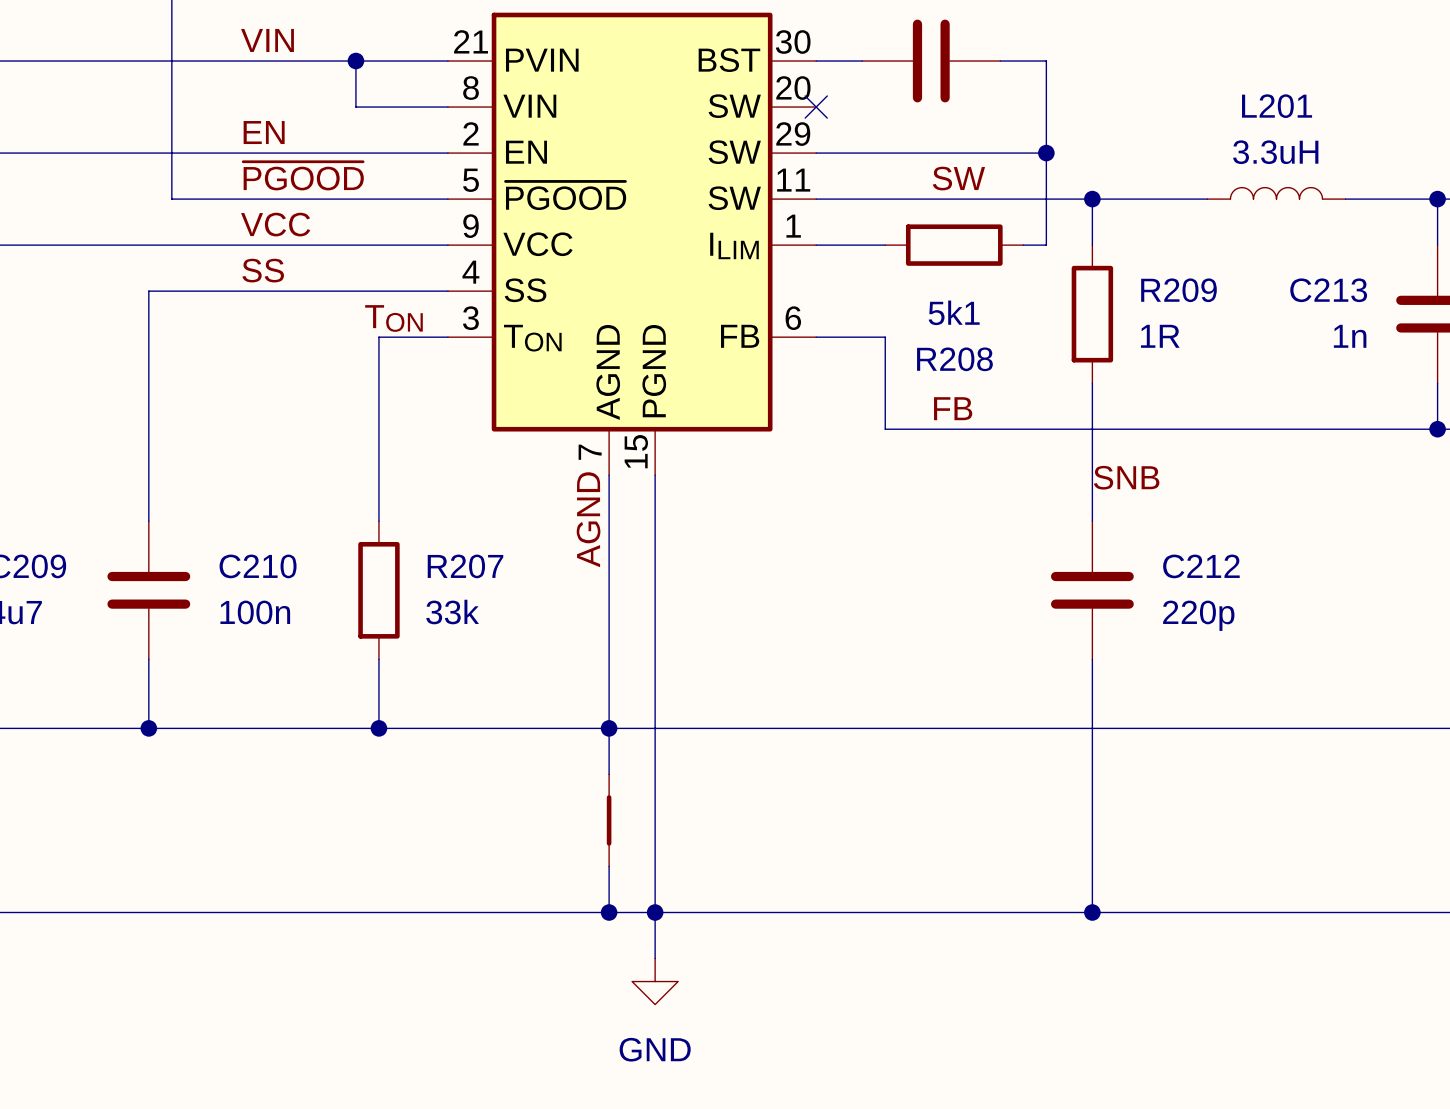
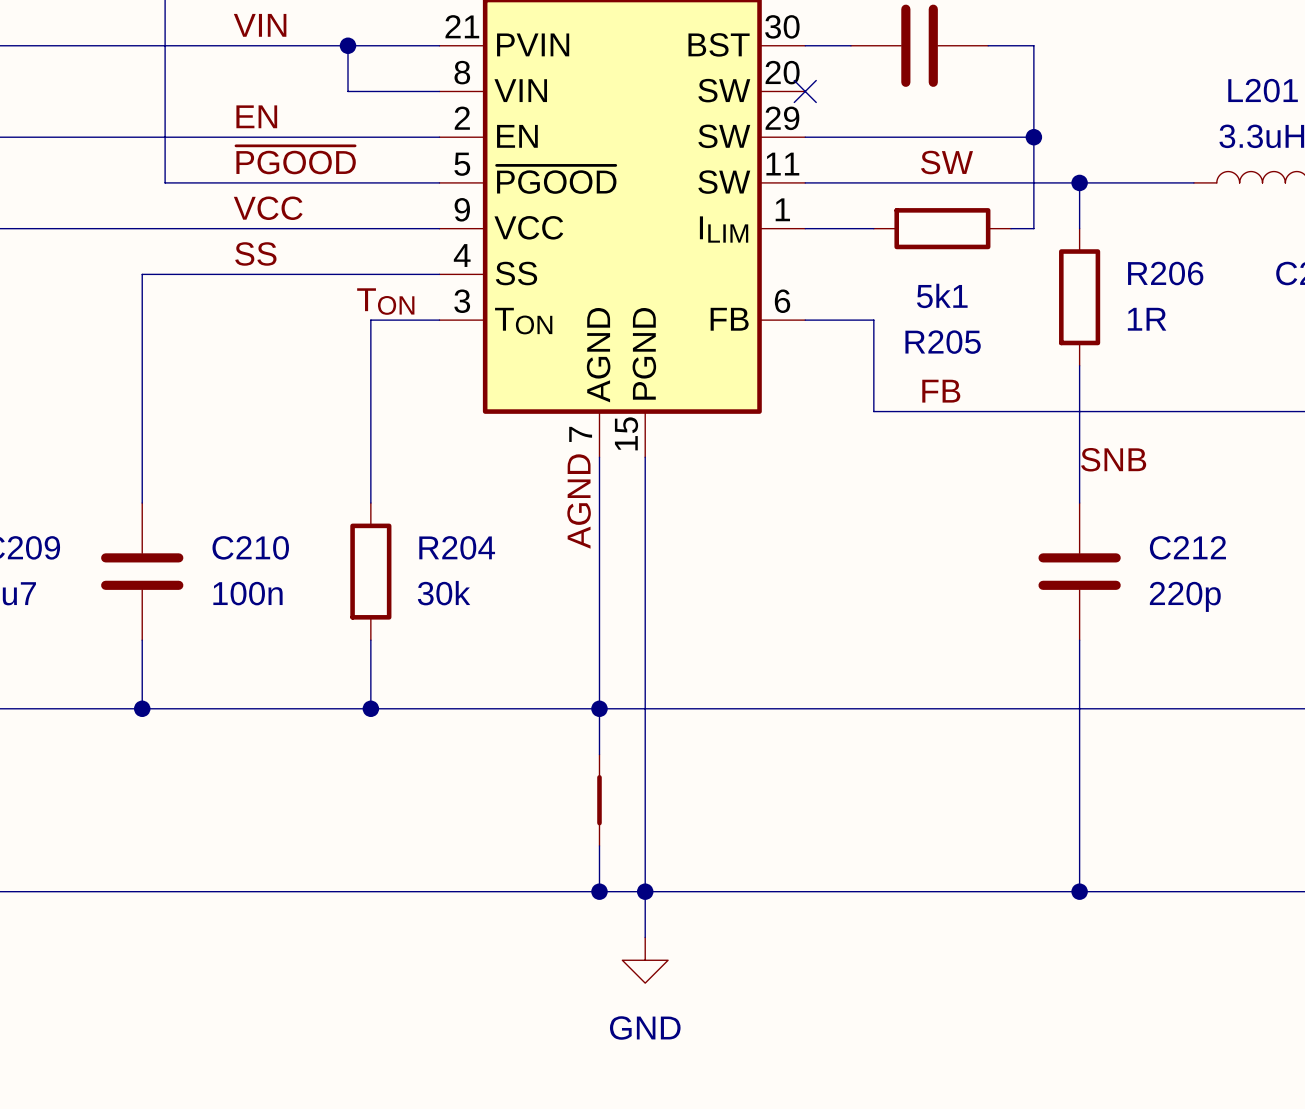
R209 name: R209 (1178, 290) -> R206 (1165, 273)
R208 name: R208 (954, 359) -> R205 (943, 342)
R207 name: R207 (465, 566) -> R204 (457, 547)
R207 value: 33k (452, 612) -> 30k (444, 593)

